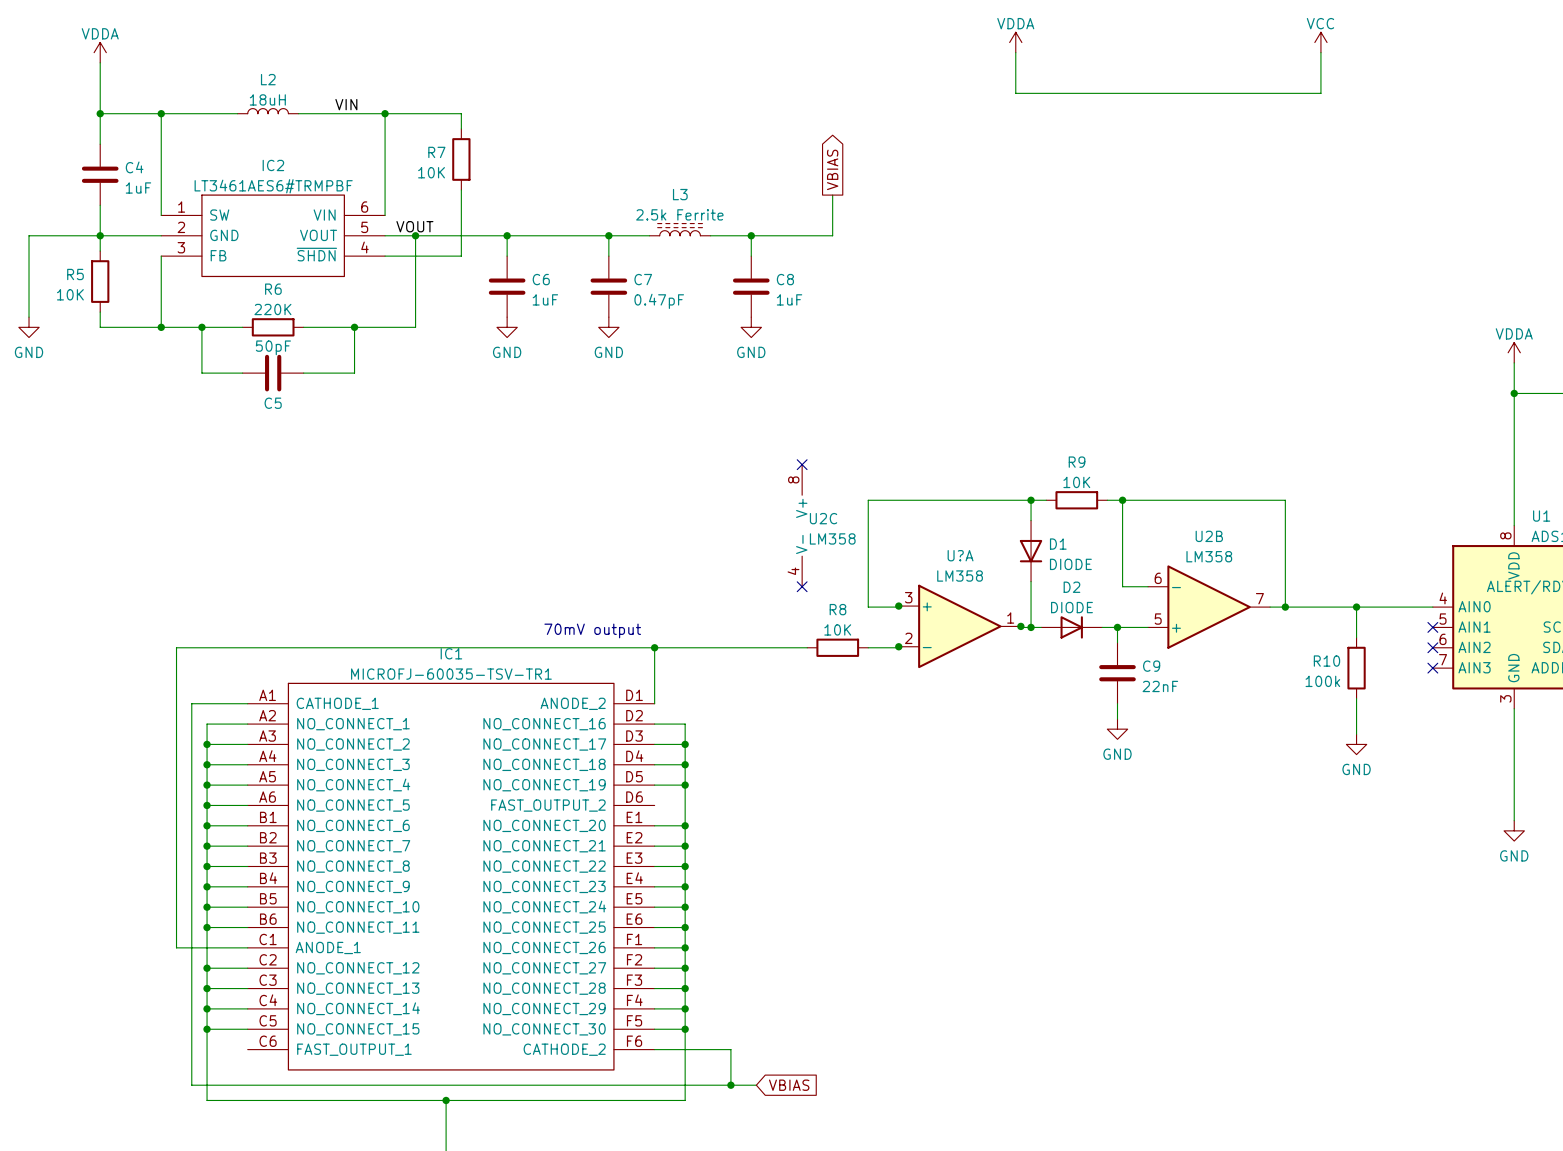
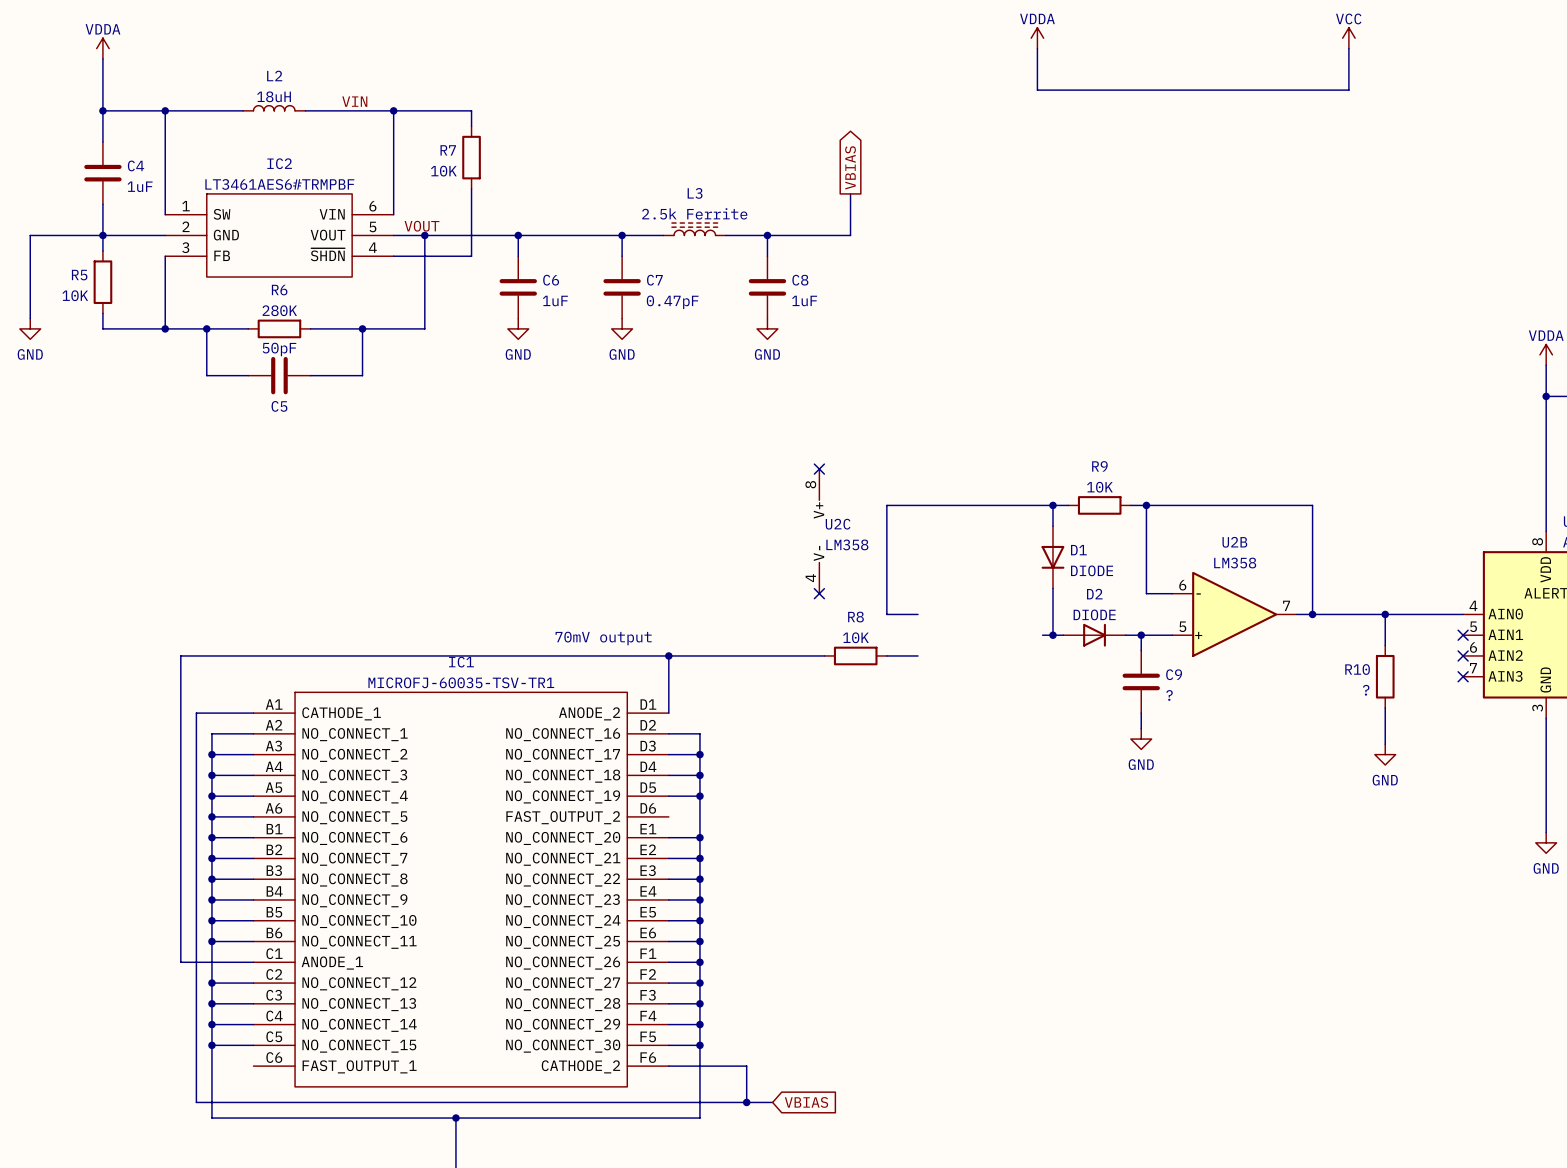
R6 value: 220K (272, 309) -> 280K (279, 310)
junction: (898, 606) -> none
U?A: LM358 (959, 626) -> none
junction: (1020, 626) -> none
junction: (898, 646) -> none
R10 value: 100k (1322, 681) -> ? (1366, 690)
C9 value: 22nF (1160, 686) -> ? (1169, 695)

